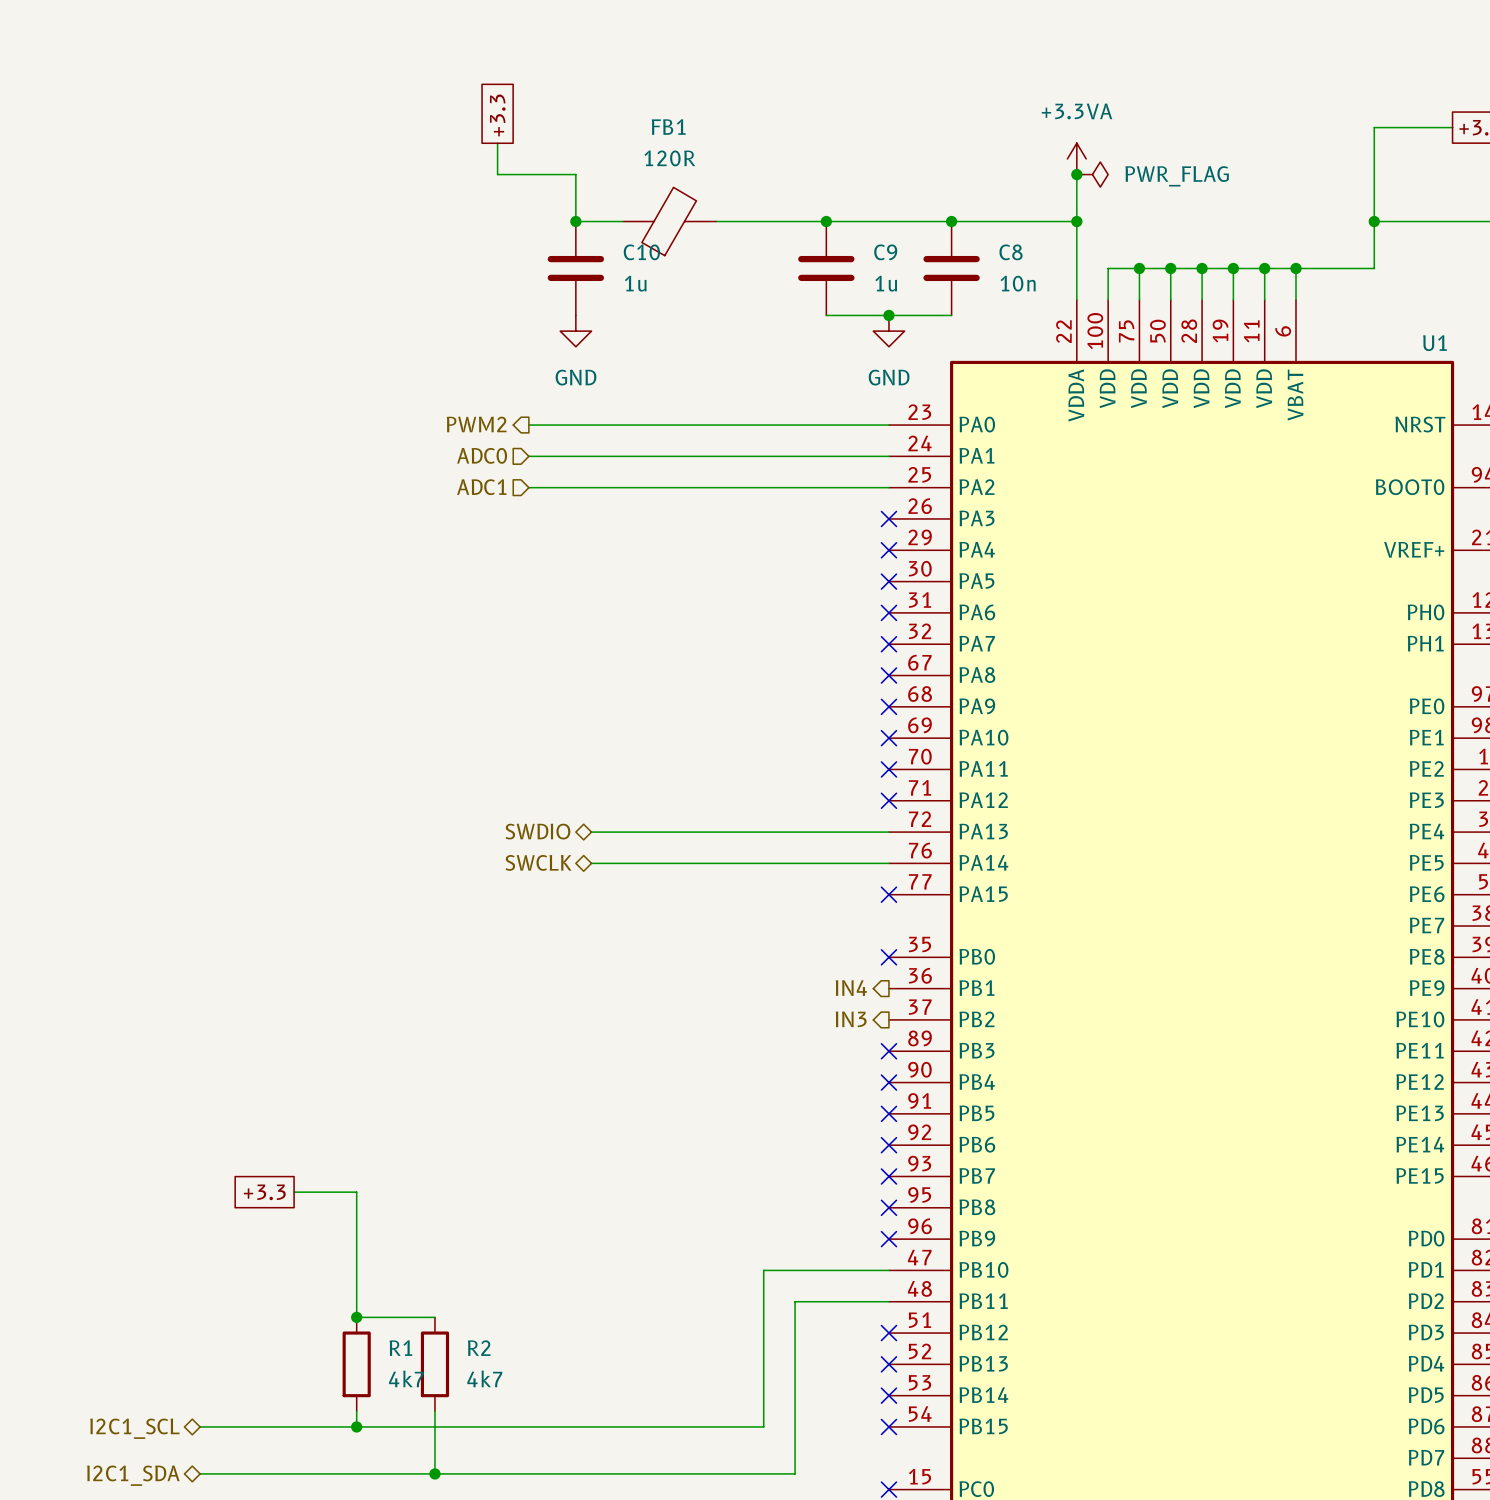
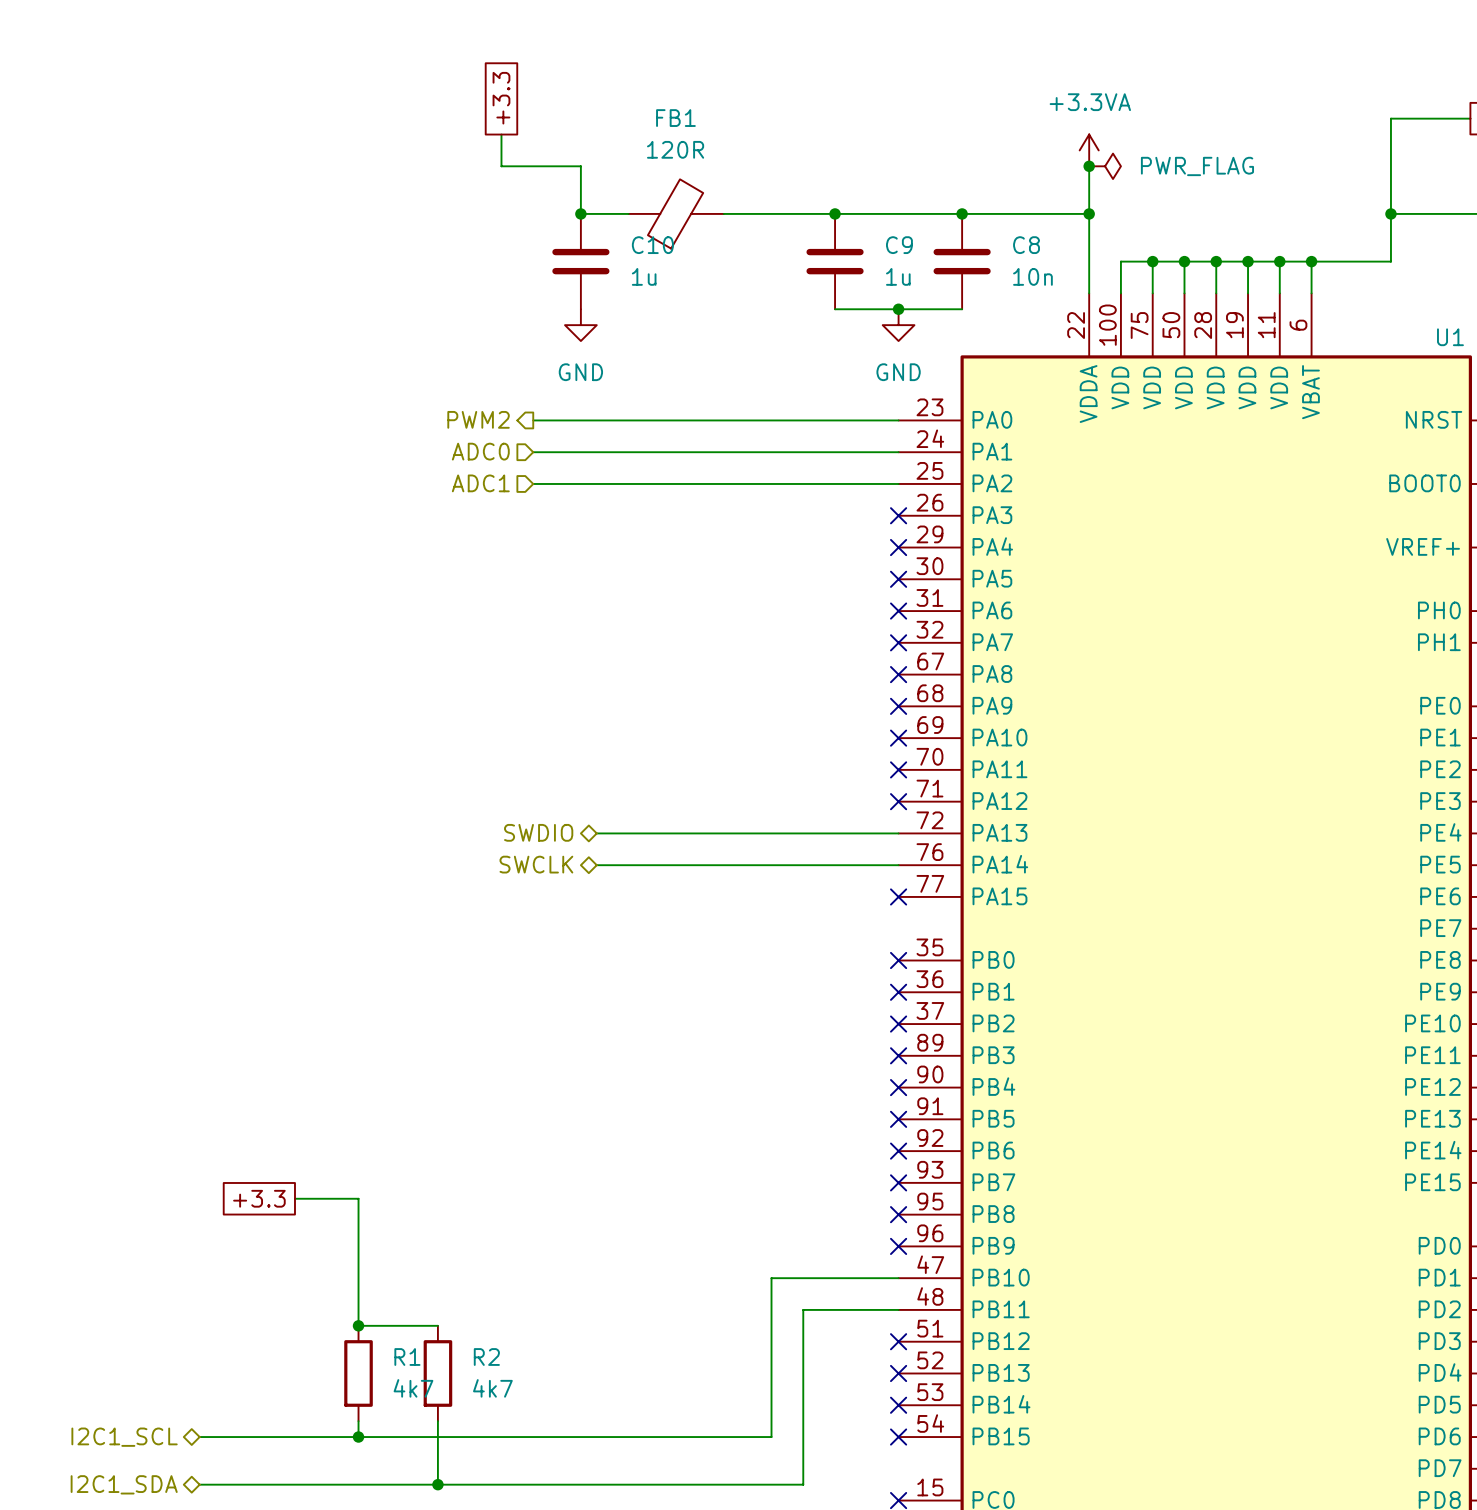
hierarchical label: IN4 (851, 988) -> none
no-connect mark: none -> (898, 992)
hierarchical label: IN3 (851, 1019) -> none
no-connect mark: none -> (898, 1024)

